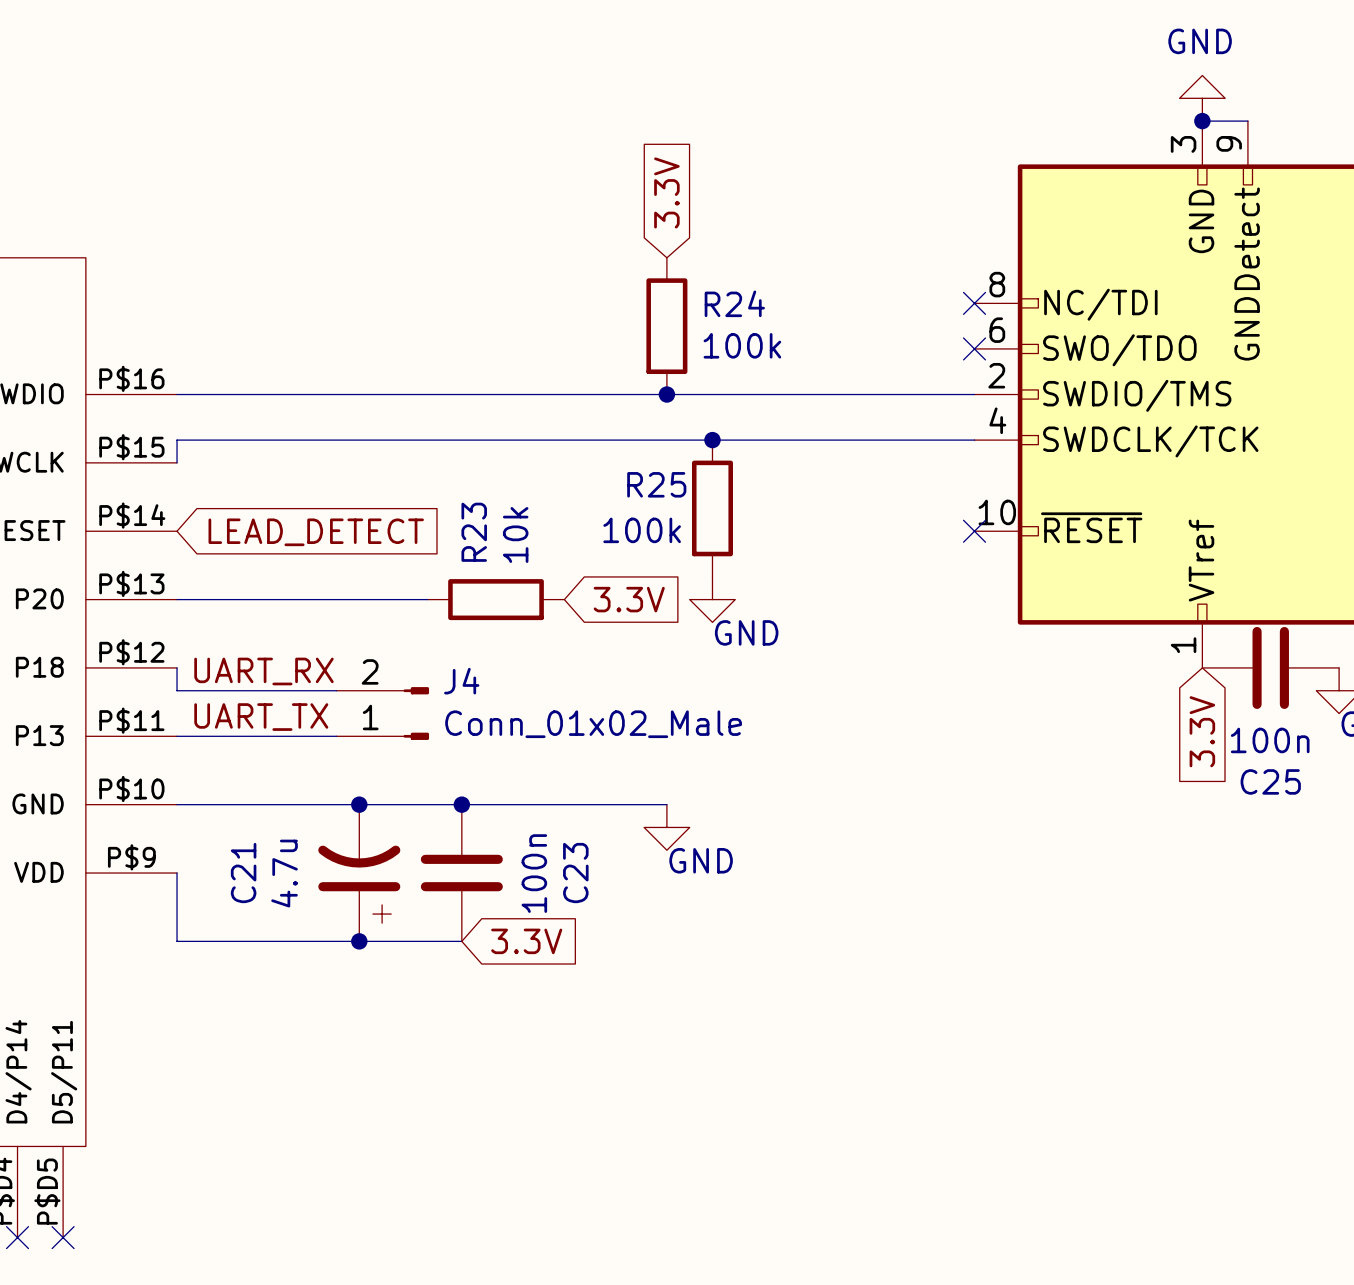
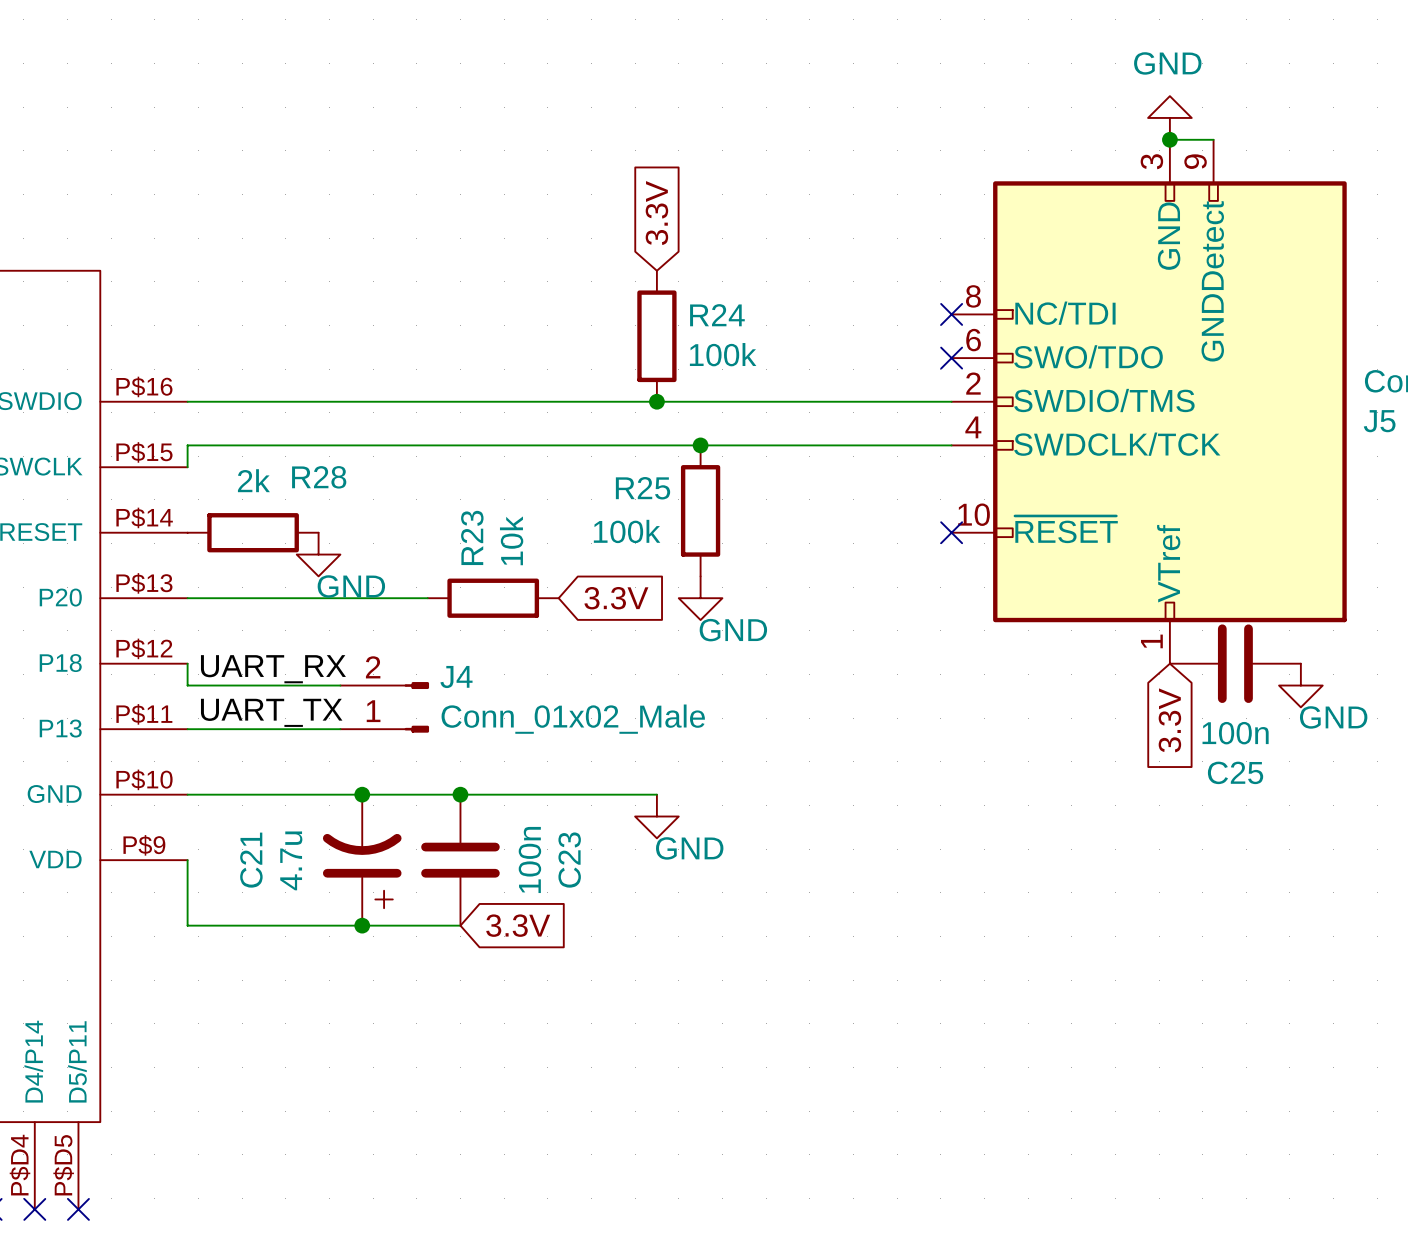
R28: none -> 2k (253, 532)
global label: LEAD_DETECT (316, 532) -> none
power symbol: none -> GND (318, 554)

